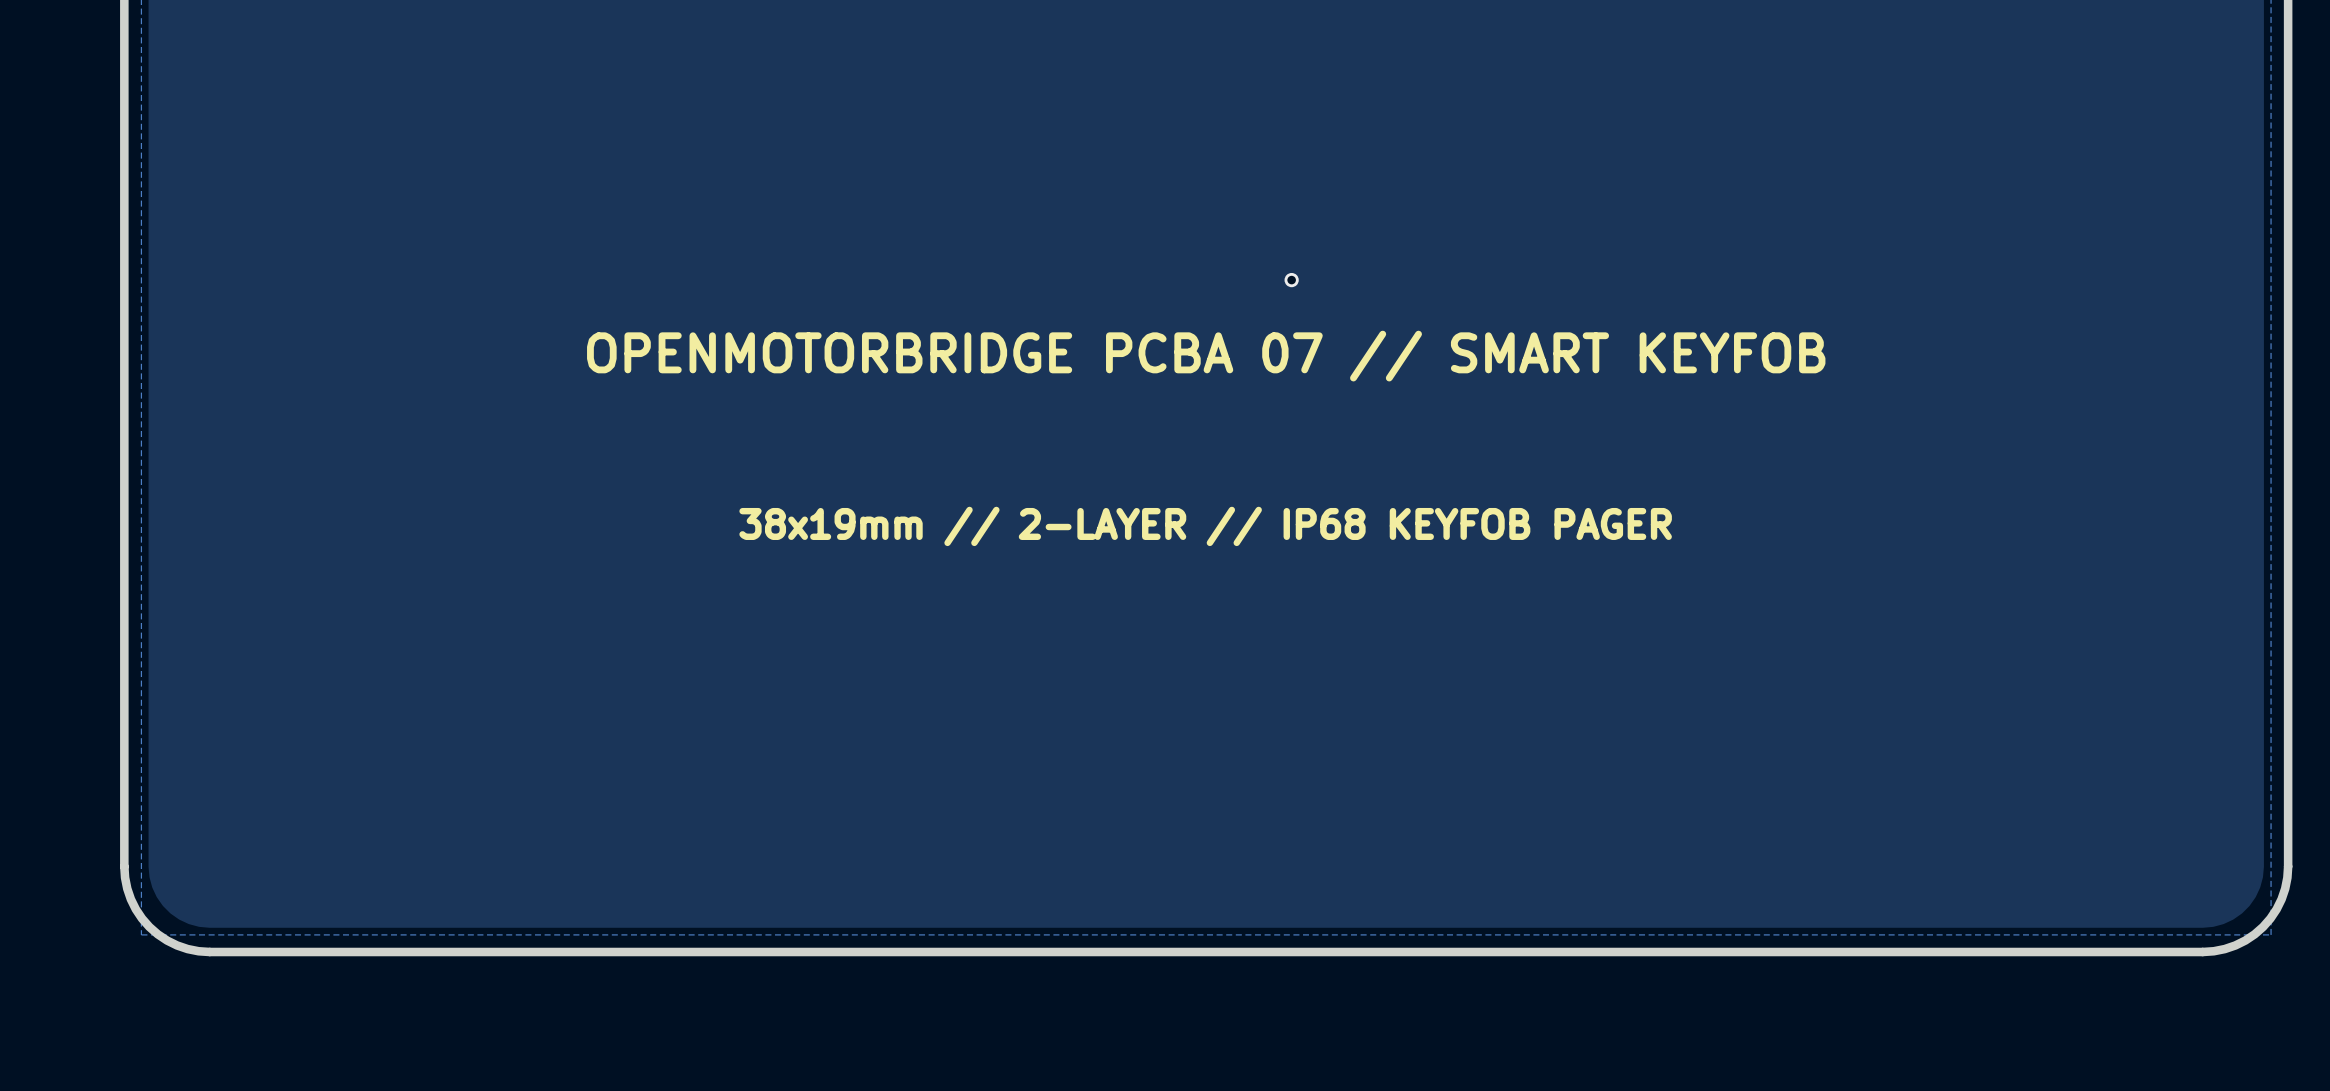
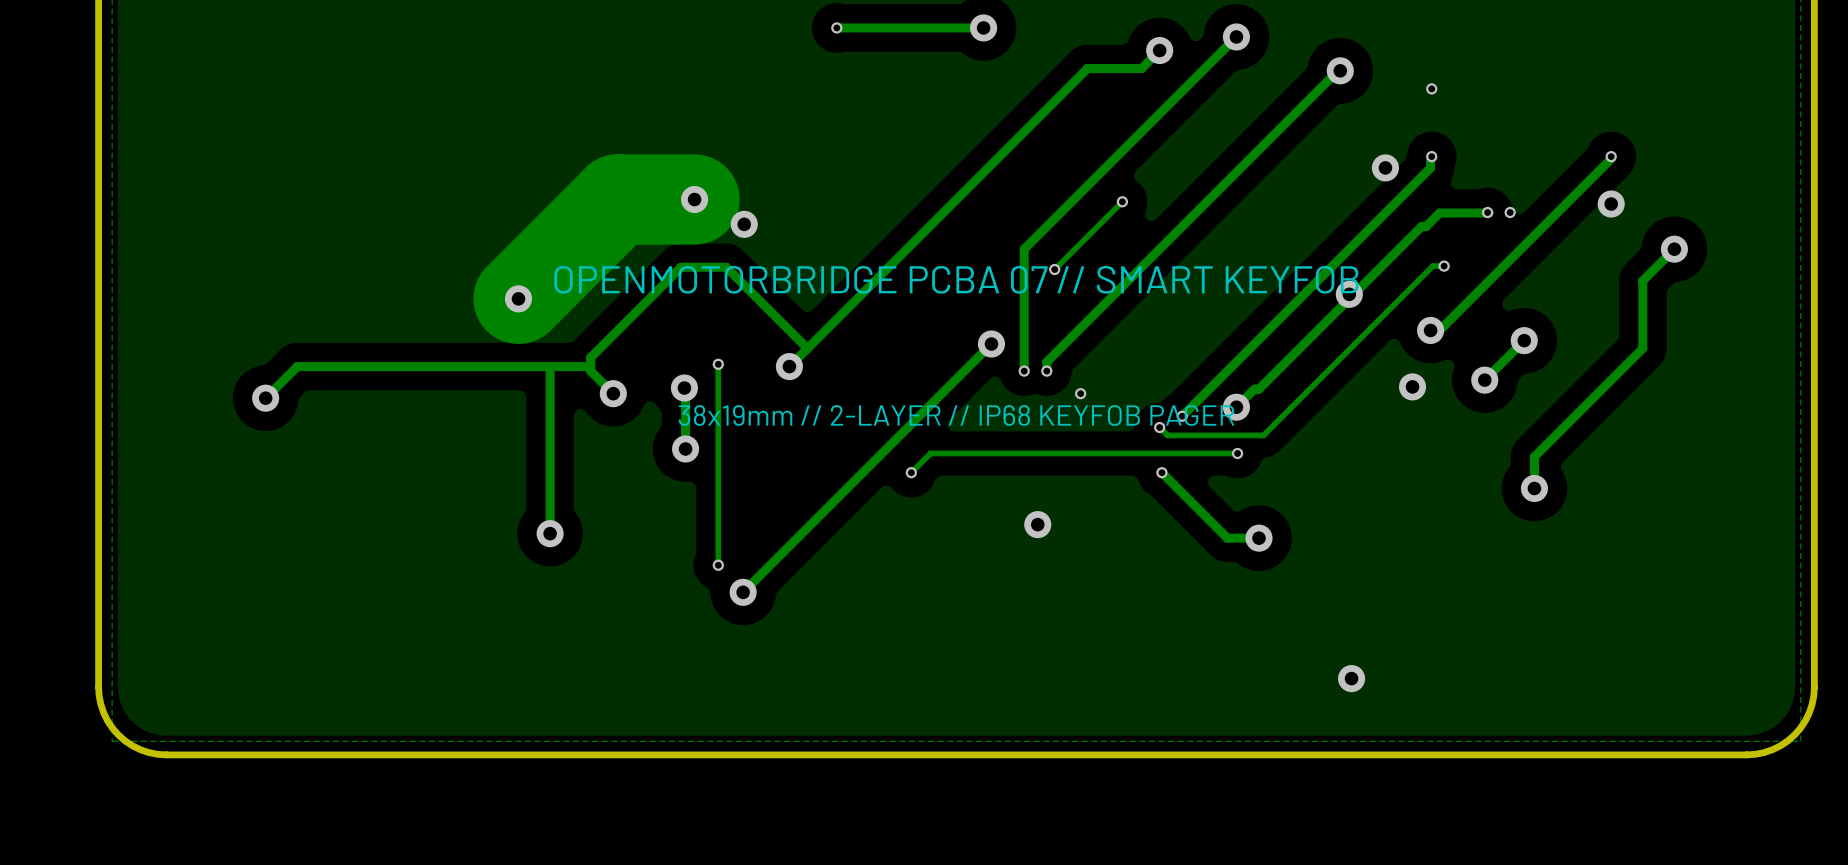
via: none -> (836, 27)
track: none -> (983, 27) (839, 27)
via: none -> (983, 27)
track: none -> (1236, 36) (1024, 249) (1024, 371)
via: none -> (1236, 36)
track: none -> (1159, 50) (1141, 68) (1087, 68) (789, 366)
via: none -> (1159, 50)
track: none -> (1340, 68) (1046, 362) (1046, 371)
via: none -> (1340, 70)
via: none -> (1431, 88)
via: none -> (1431, 156)
via: none -> (1611, 156)
track: none -> (1430, 158) (1430, 167) (1182, 416)
track: none -> (1611, 158) (1439, 330) (1430, 330)
via: none -> (1385, 167)
track: none -> (694, 199) (617, 199) (518, 298)
via: none -> (694, 199)
track: none -> (1122, 201) (1054, 269)
via: none -> (1122, 201)
via: none -> (1611, 204)
via: none -> (1487, 212)
via: none -> (1510, 212)
track: none -> (1489, 213) (1439, 213) (1426, 226) (1421, 226) (1259, 389) (1254, 389) (1236, 407)
via: (1291, 280) -> none
via: none -> (744, 224)
track: none -> (1674, 249) (1642, 280) (1642, 348) (1534, 456) (1534, 488)
via: none -> (1674, 249)
track: none -> (1444, 266) (1432, 266) (1263, 435) (1167, 435) (1159, 427)
via: none -> (1444, 266)
via: none -> (1054, 269)
via: none -> (1349, 294)
via: none -> (518, 298)
via: none -> (1430, 330)
track: none -> (1524, 340) (1484, 380)
via: none -> (1524, 340)
track: none -> (991, 344) (743, 592)
via: none -> (991, 344)
track: none -> (807, 348) (726, 267) (681, 267) (590, 357) (590, 371) (613, 393)
track: none -> (718, 364) (718, 565)
via: none -> (718, 364)
track: none -> (550, 366) (550, 533)
track: none -> (590, 366) (297, 366) (265, 398)
via: none -> (789, 366)
via: none -> (1024, 371)
via: none -> (1046, 371)
via: none -> (1484, 380)
via: none -> (1412, 386)
via: none -> (684, 388)
track: none -> (685, 389) (685, 448)
via: none -> (613, 393)
via: none -> (1080, 393)
via: none -> (265, 398)
via: none -> (1236, 407)
via: none -> (1182, 416)
via: none -> (1159, 427)
via: none -> (685, 448)
track: none -> (1237, 453) (930, 453) (911, 472)
via: none -> (1237, 453)
via: none -> (911, 472)
via: none -> (1161, 472)
track: none -> (1164, 474) (1227, 538) (1259, 538)
via: none -> (1534, 488)
via: none -> (1037, 524)
via: none -> (550, 533)
via: none -> (1259, 538)
via: none -> (718, 565)
via: none -> (743, 592)
via: none -> (1351, 678)

